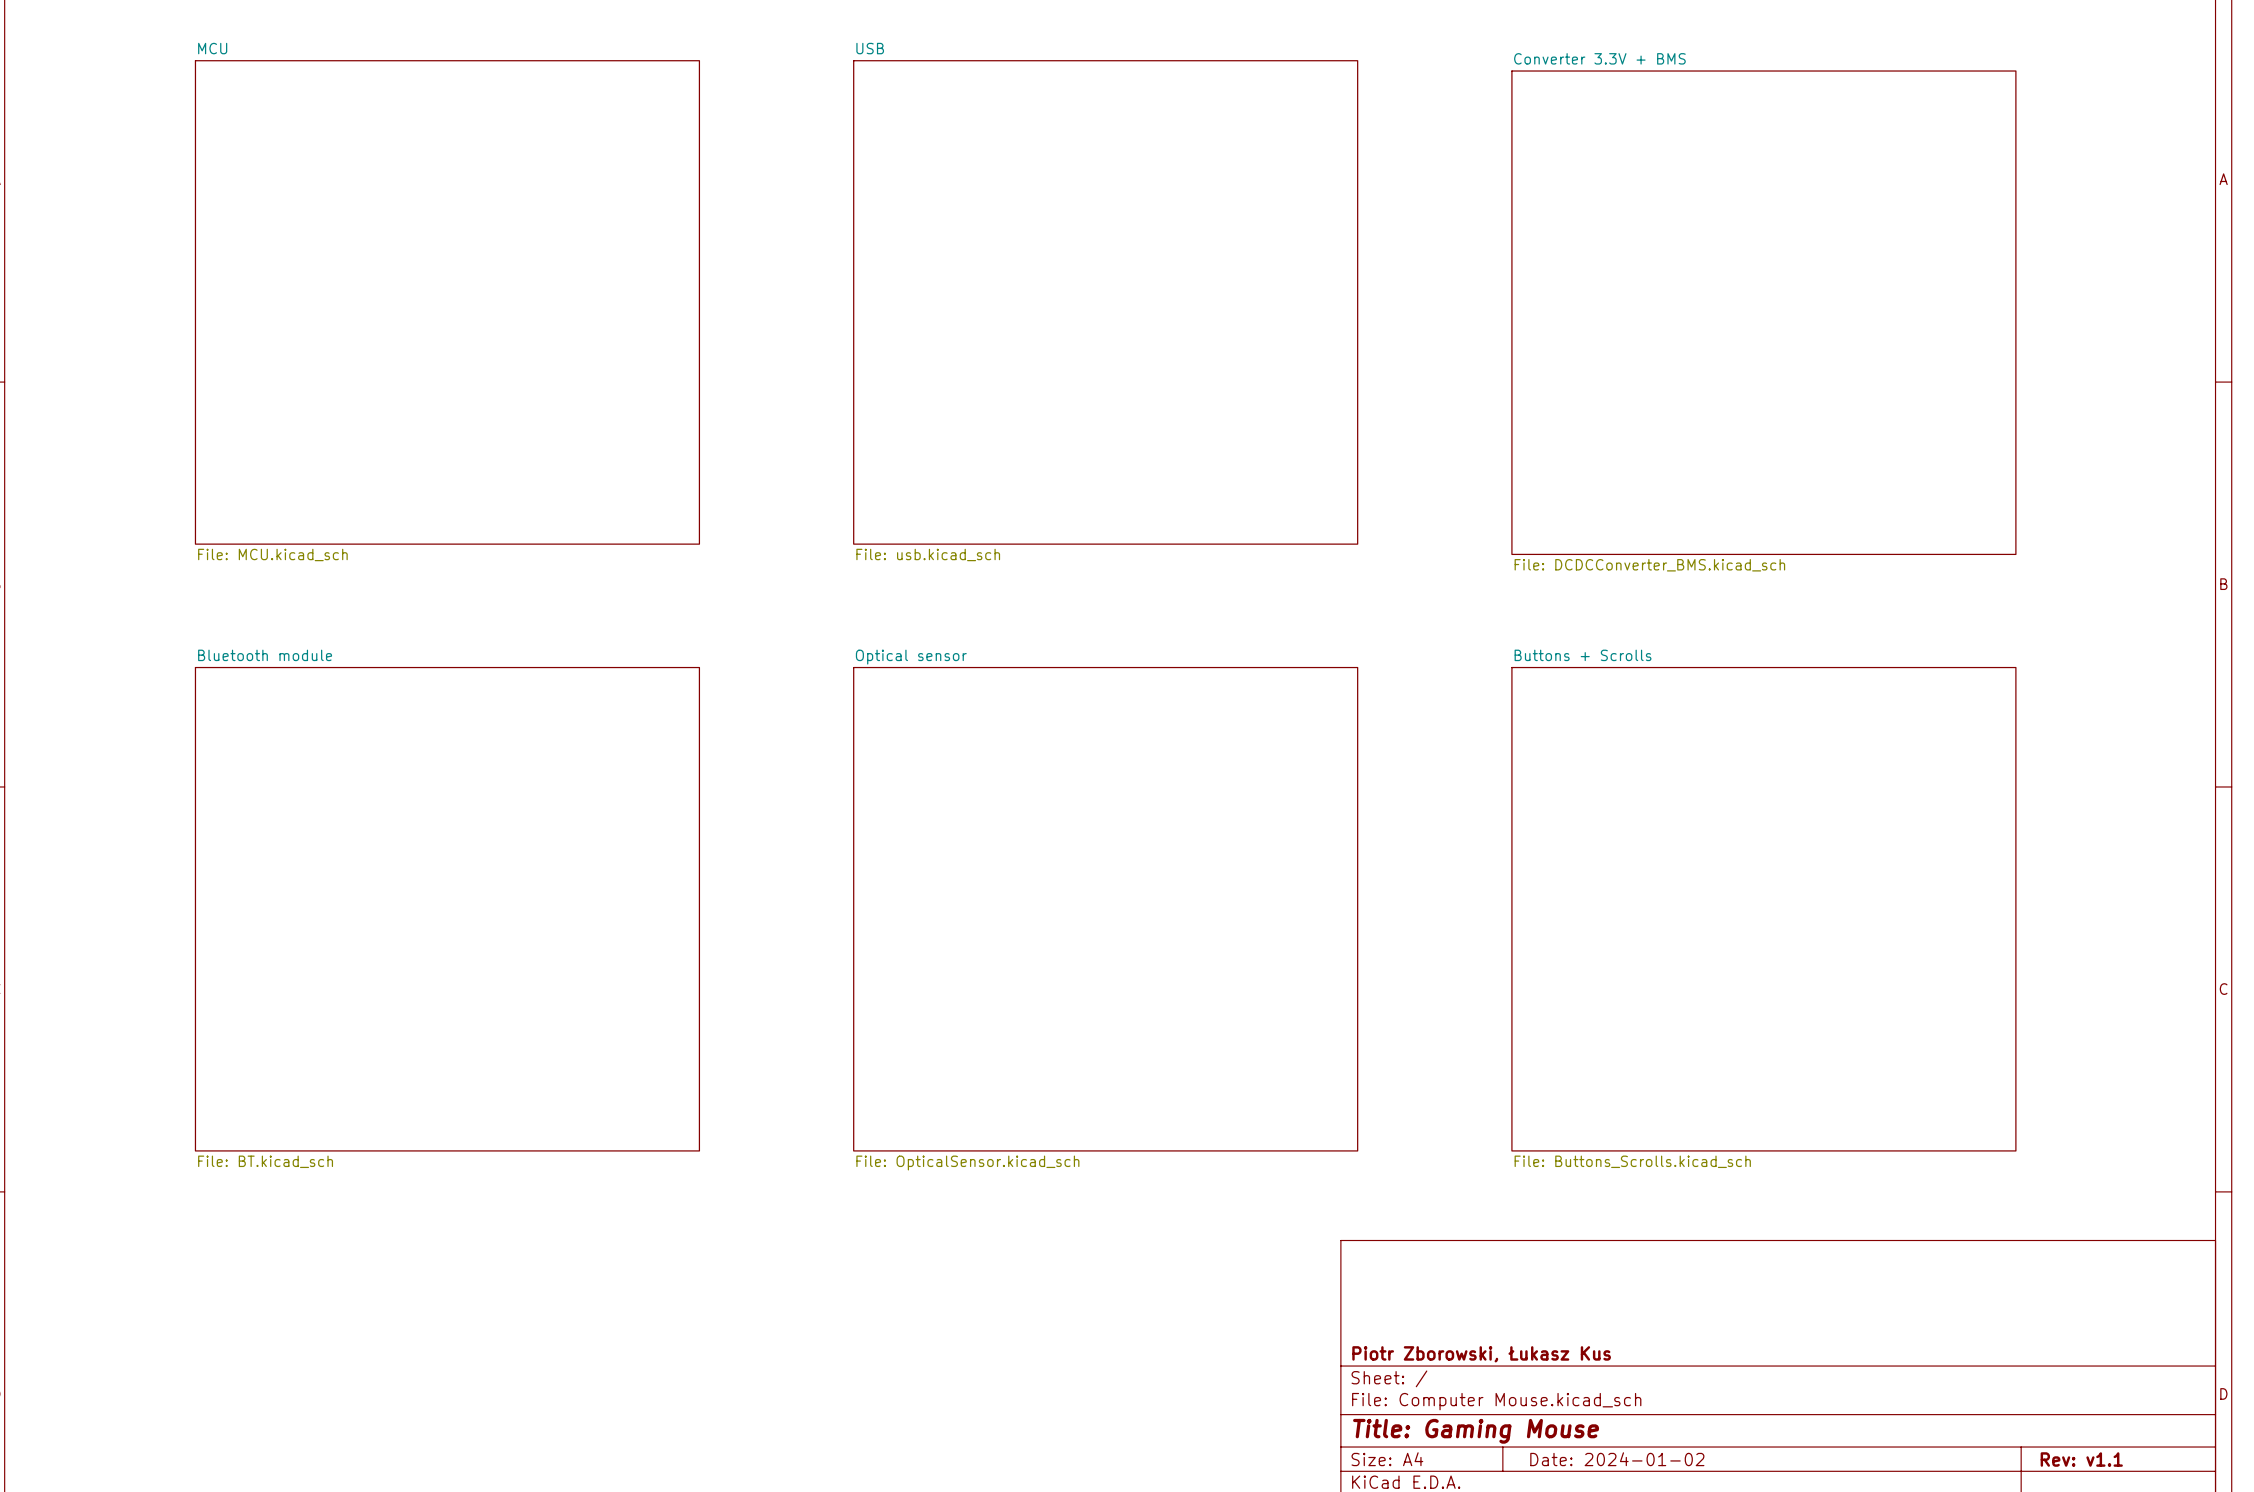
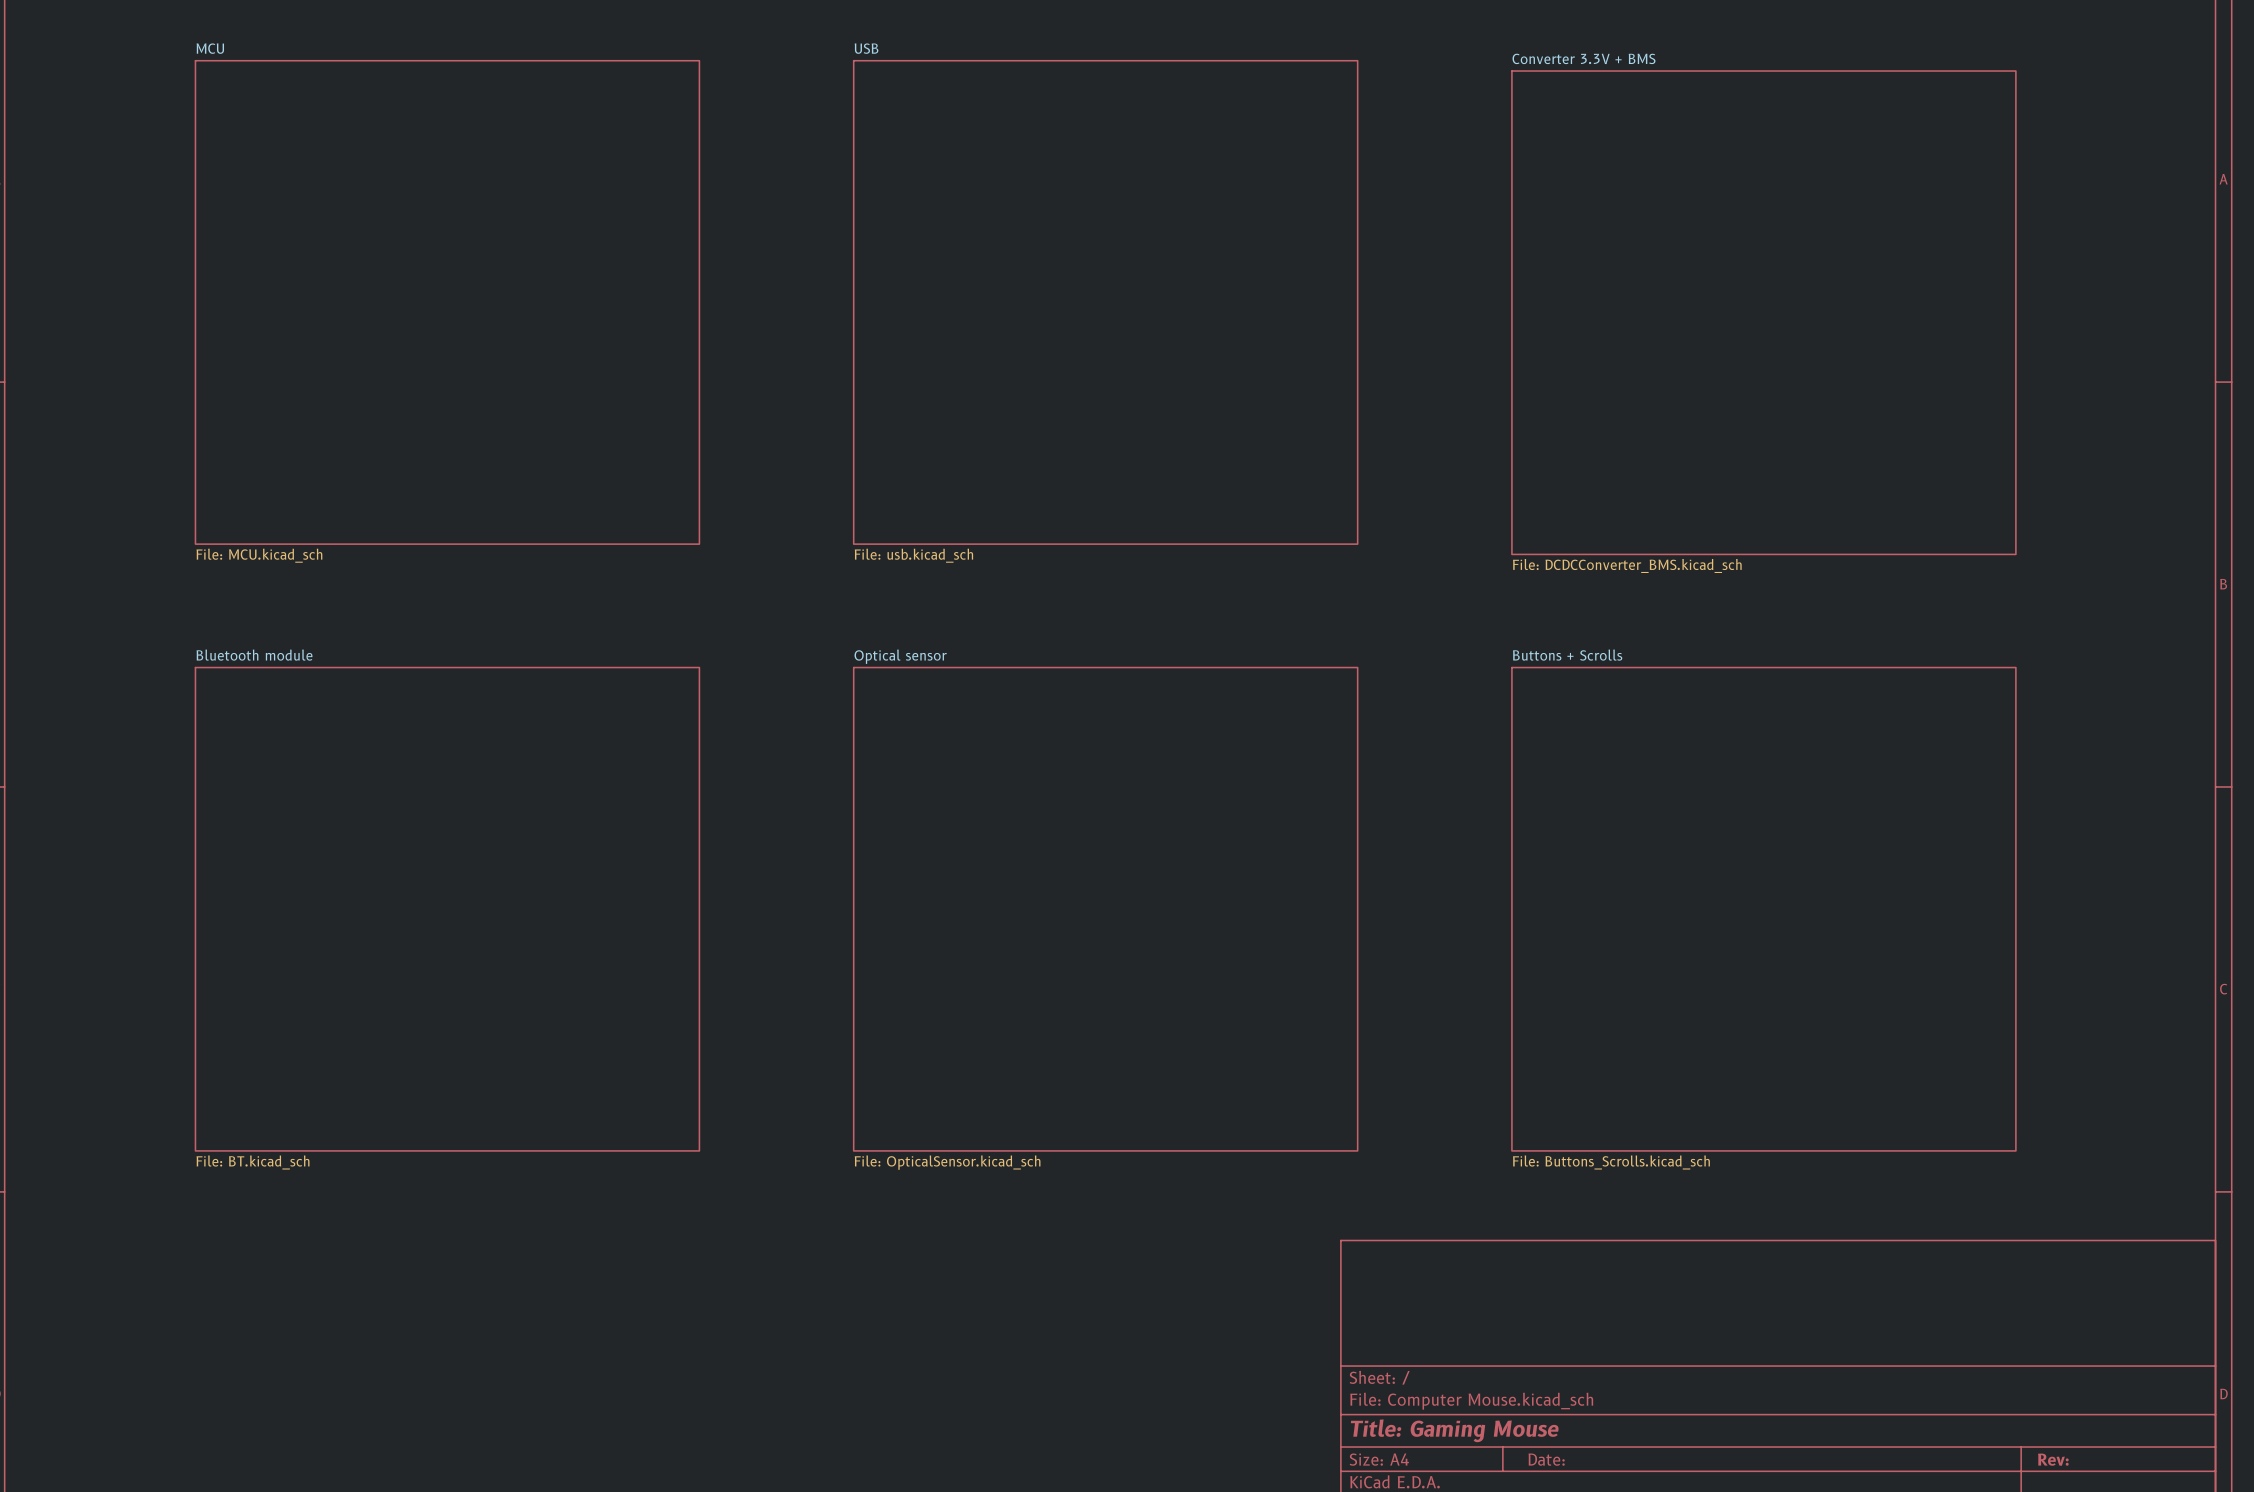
title block: Piotr Zborowski, Łukasz Kus (1481, 1354) -> none
title block: Date: 2024-01-02 (1617, 1459) -> Date: (1546, 1459)
title block: Rev: v1.1 (2081, 1459) -> Rev: (2053, 1459)

